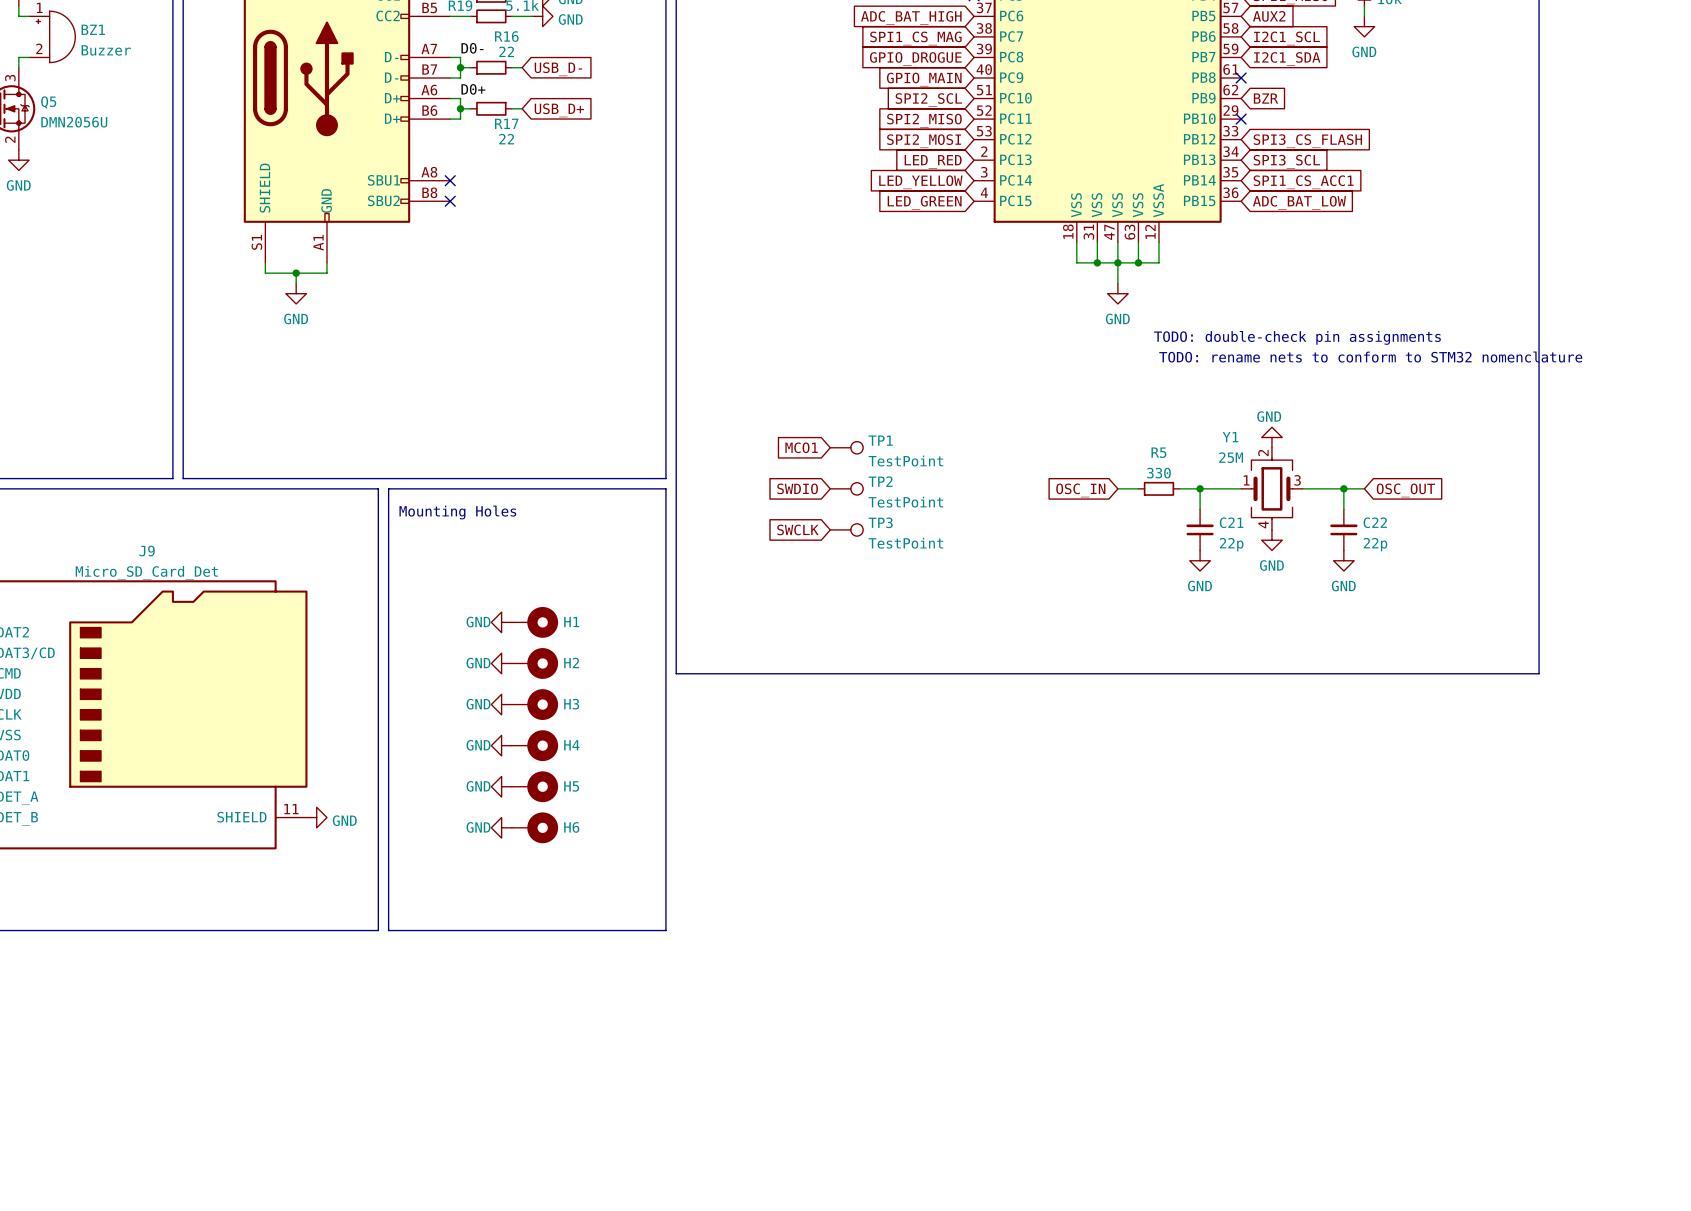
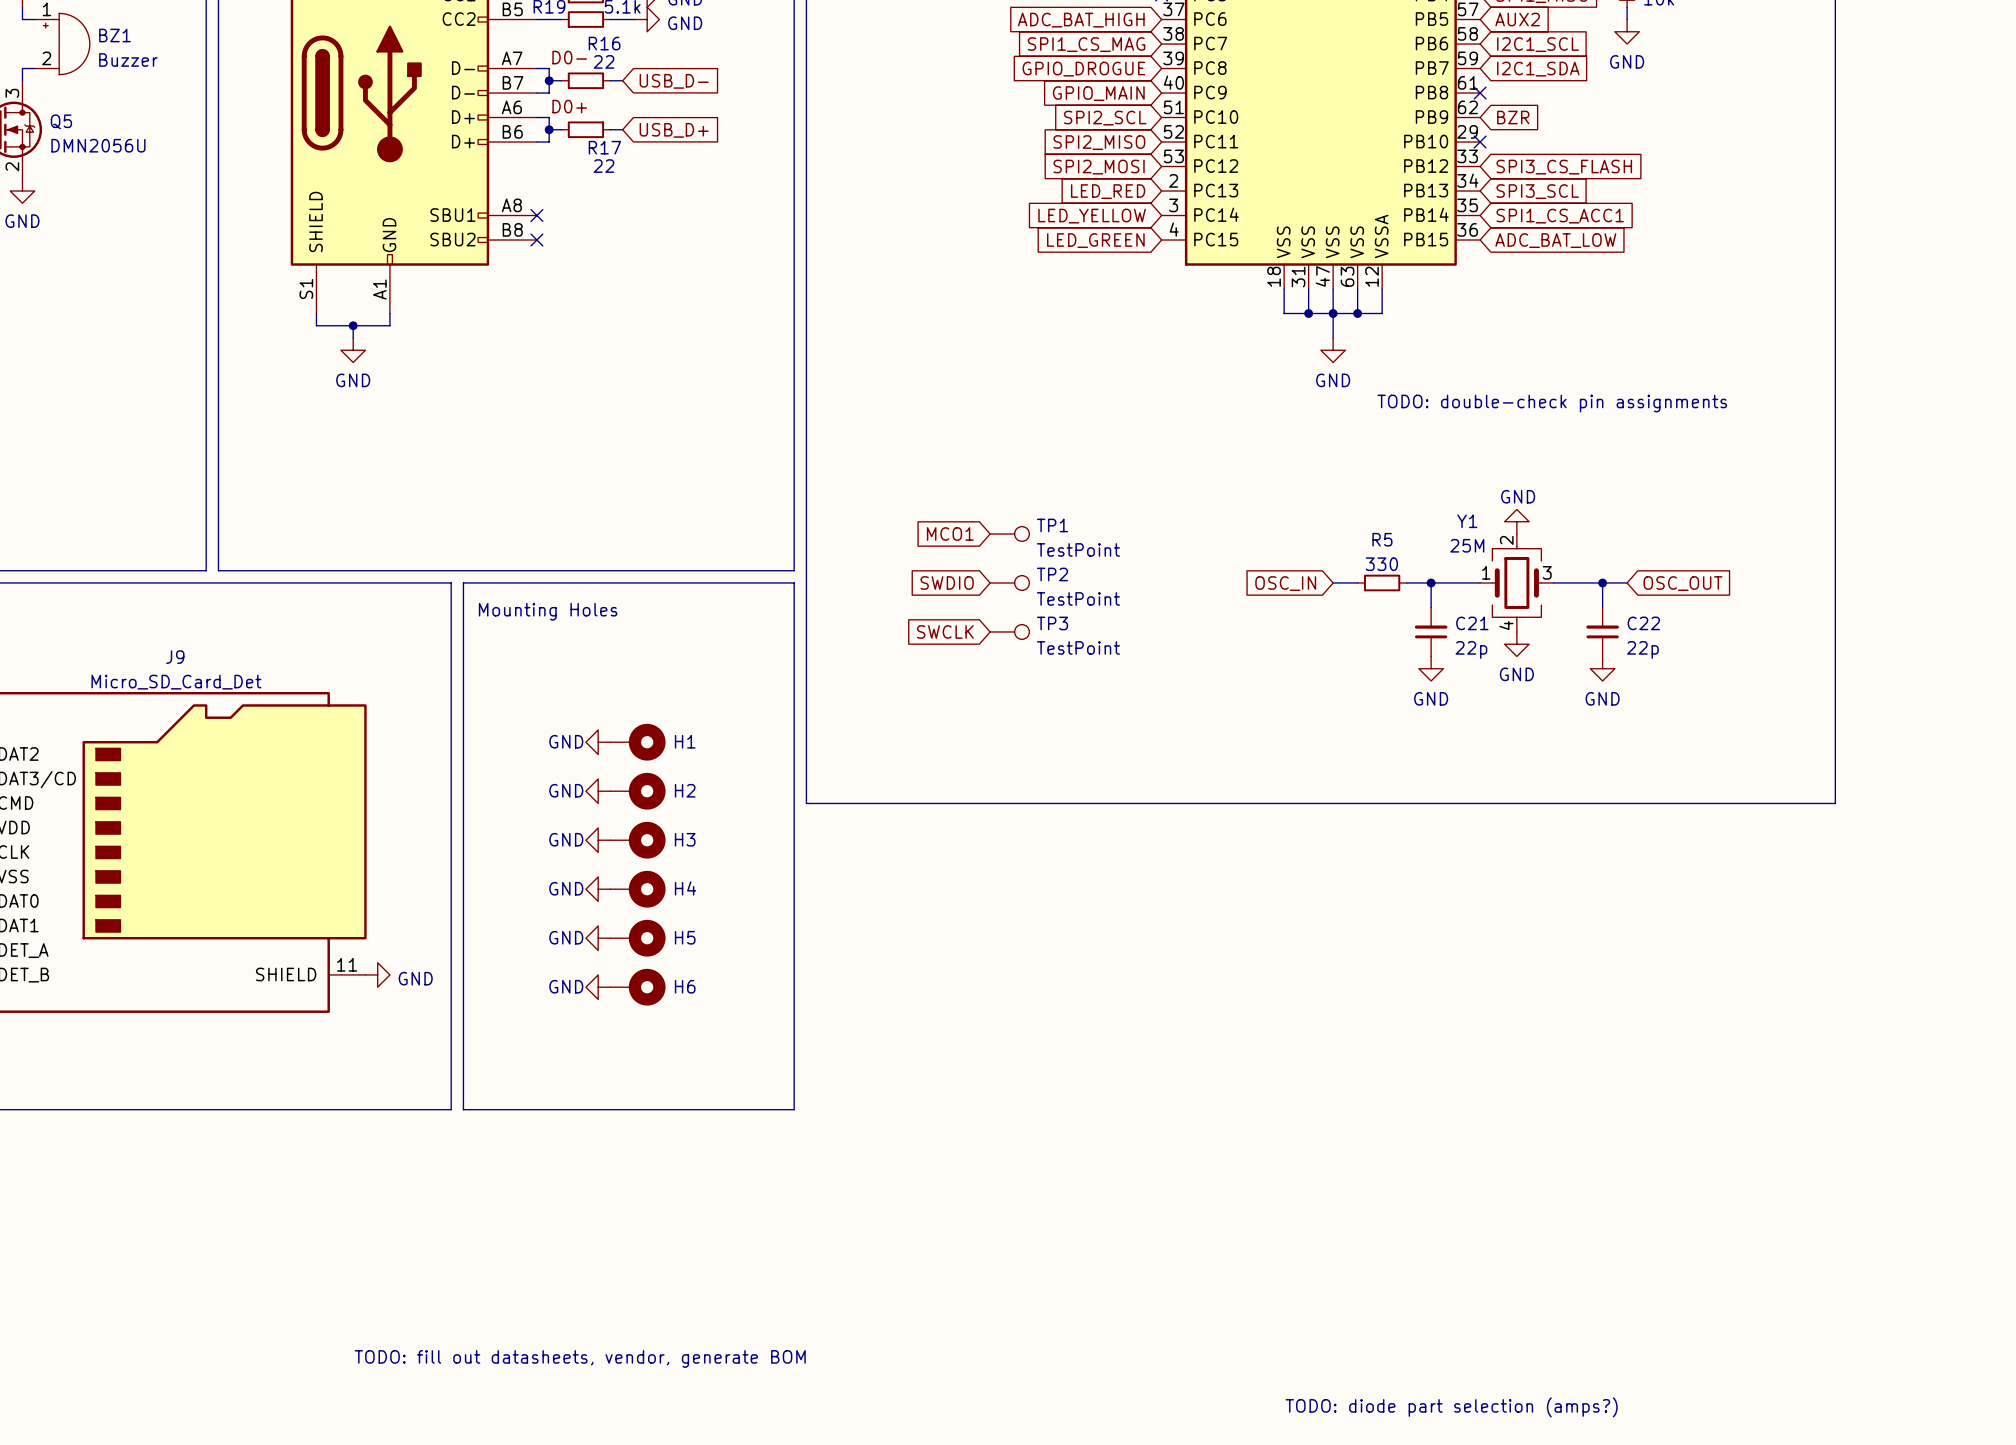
text: TODO: rename nets to conform to STM32 nomenclature (1370, 357) -> none
text: none -> TODO: fill out datasheets, vendor, generate BOM (580, 1358)
text: none -> TODO: diode part selection (amps?) (1451, 1407)

